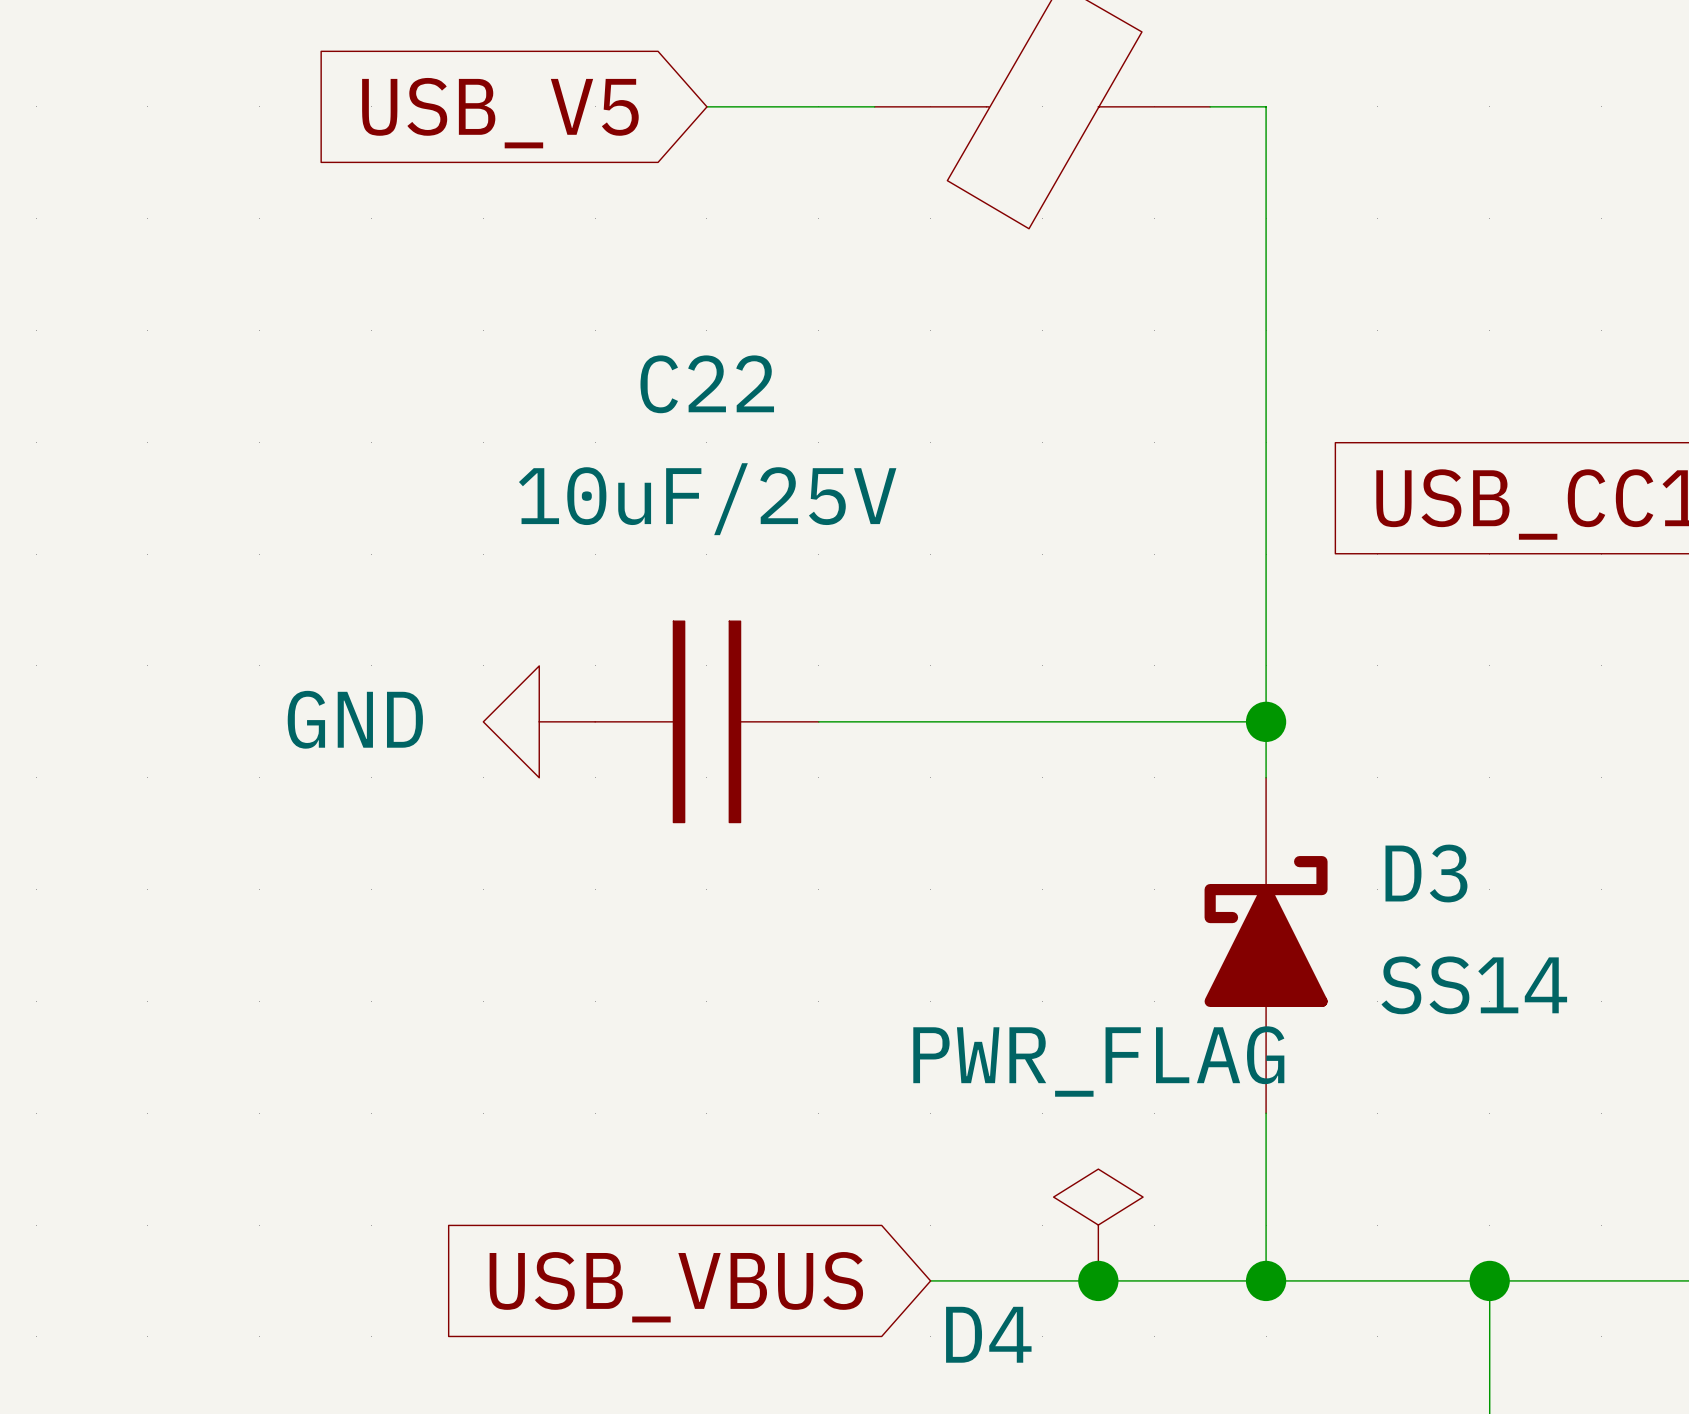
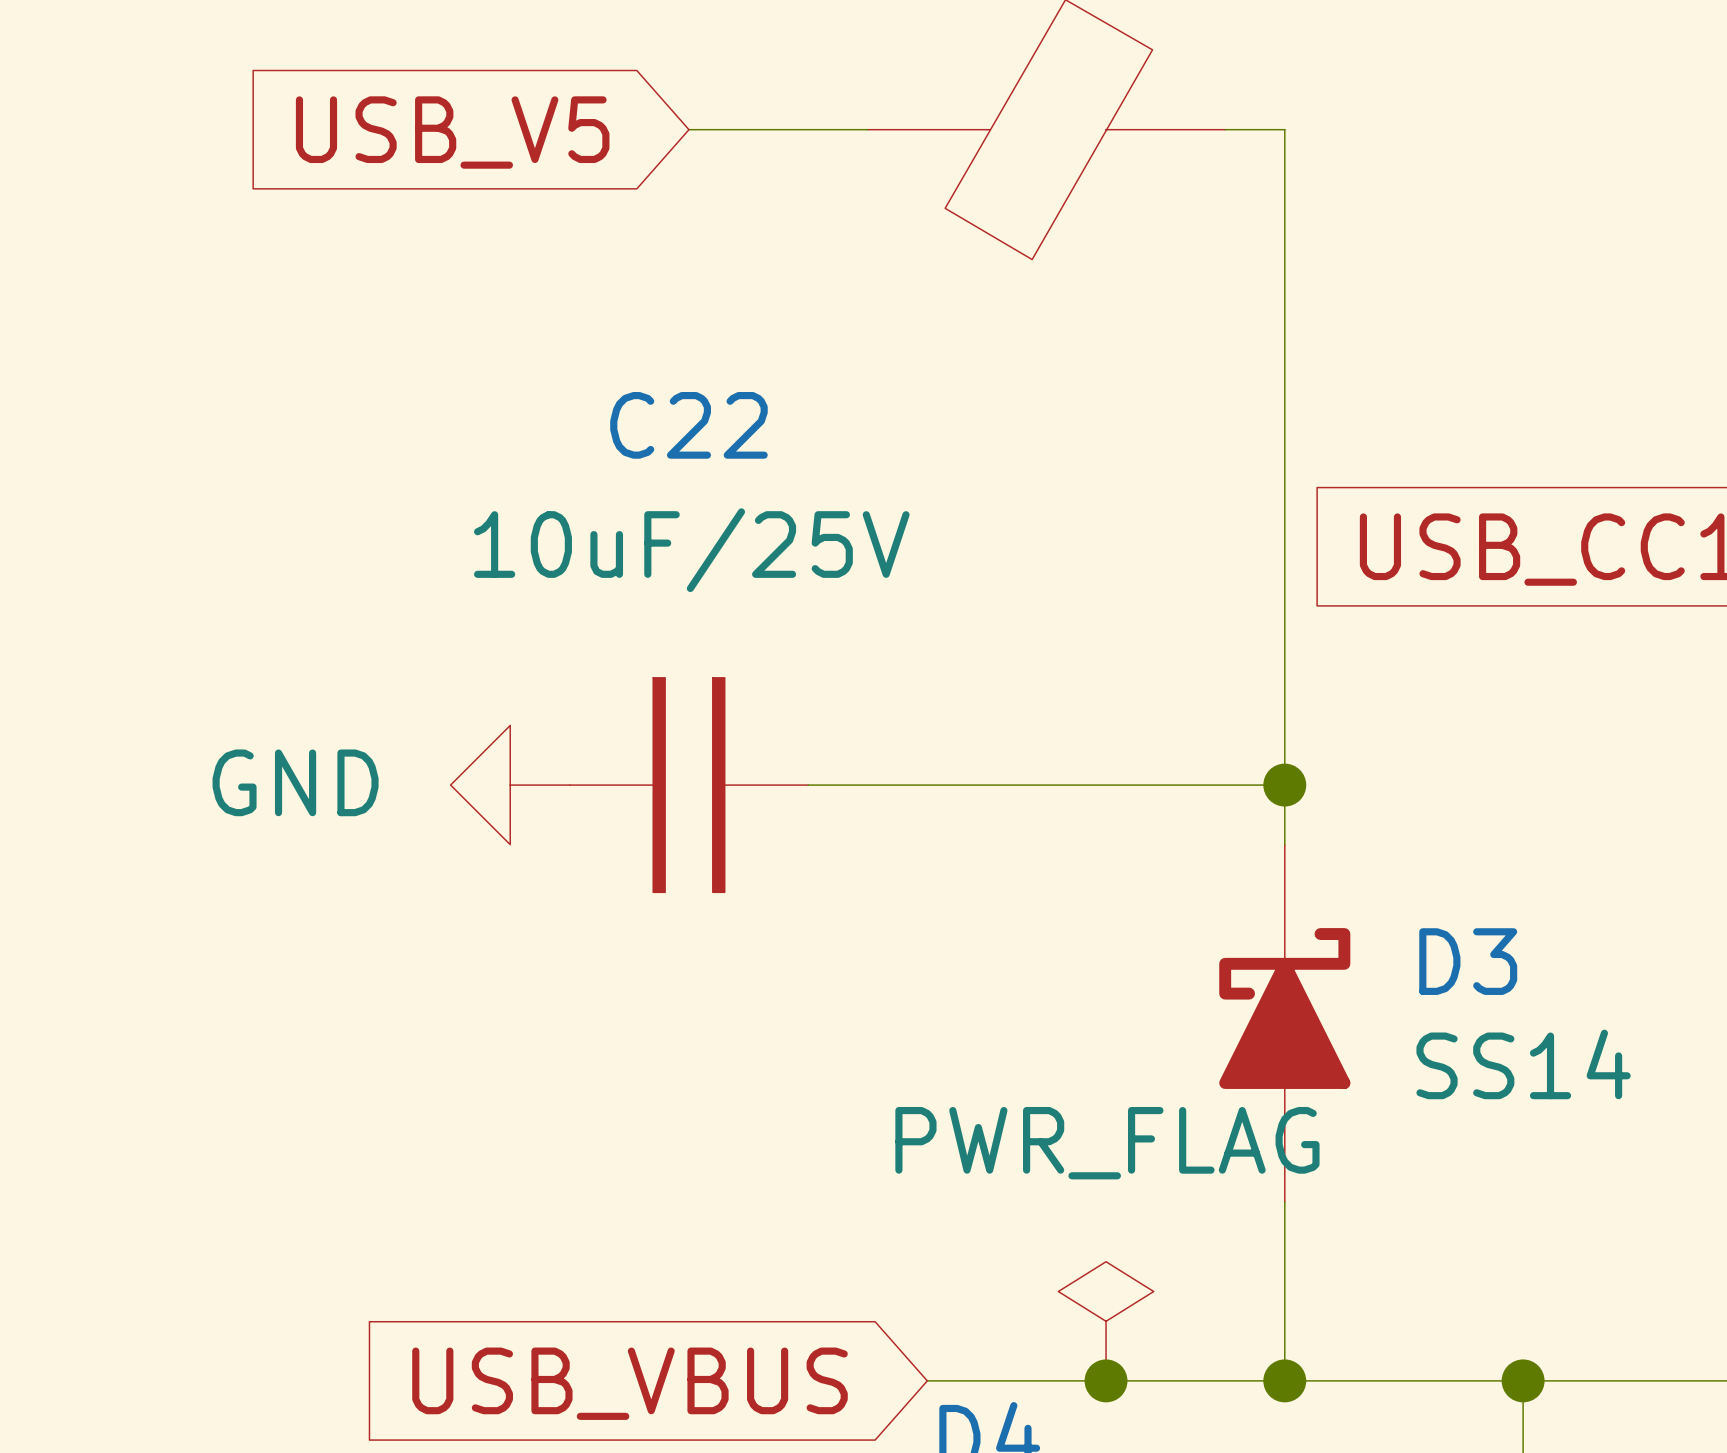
D3 name position: D3 (1426, 873) -> D3 (1468, 961)

